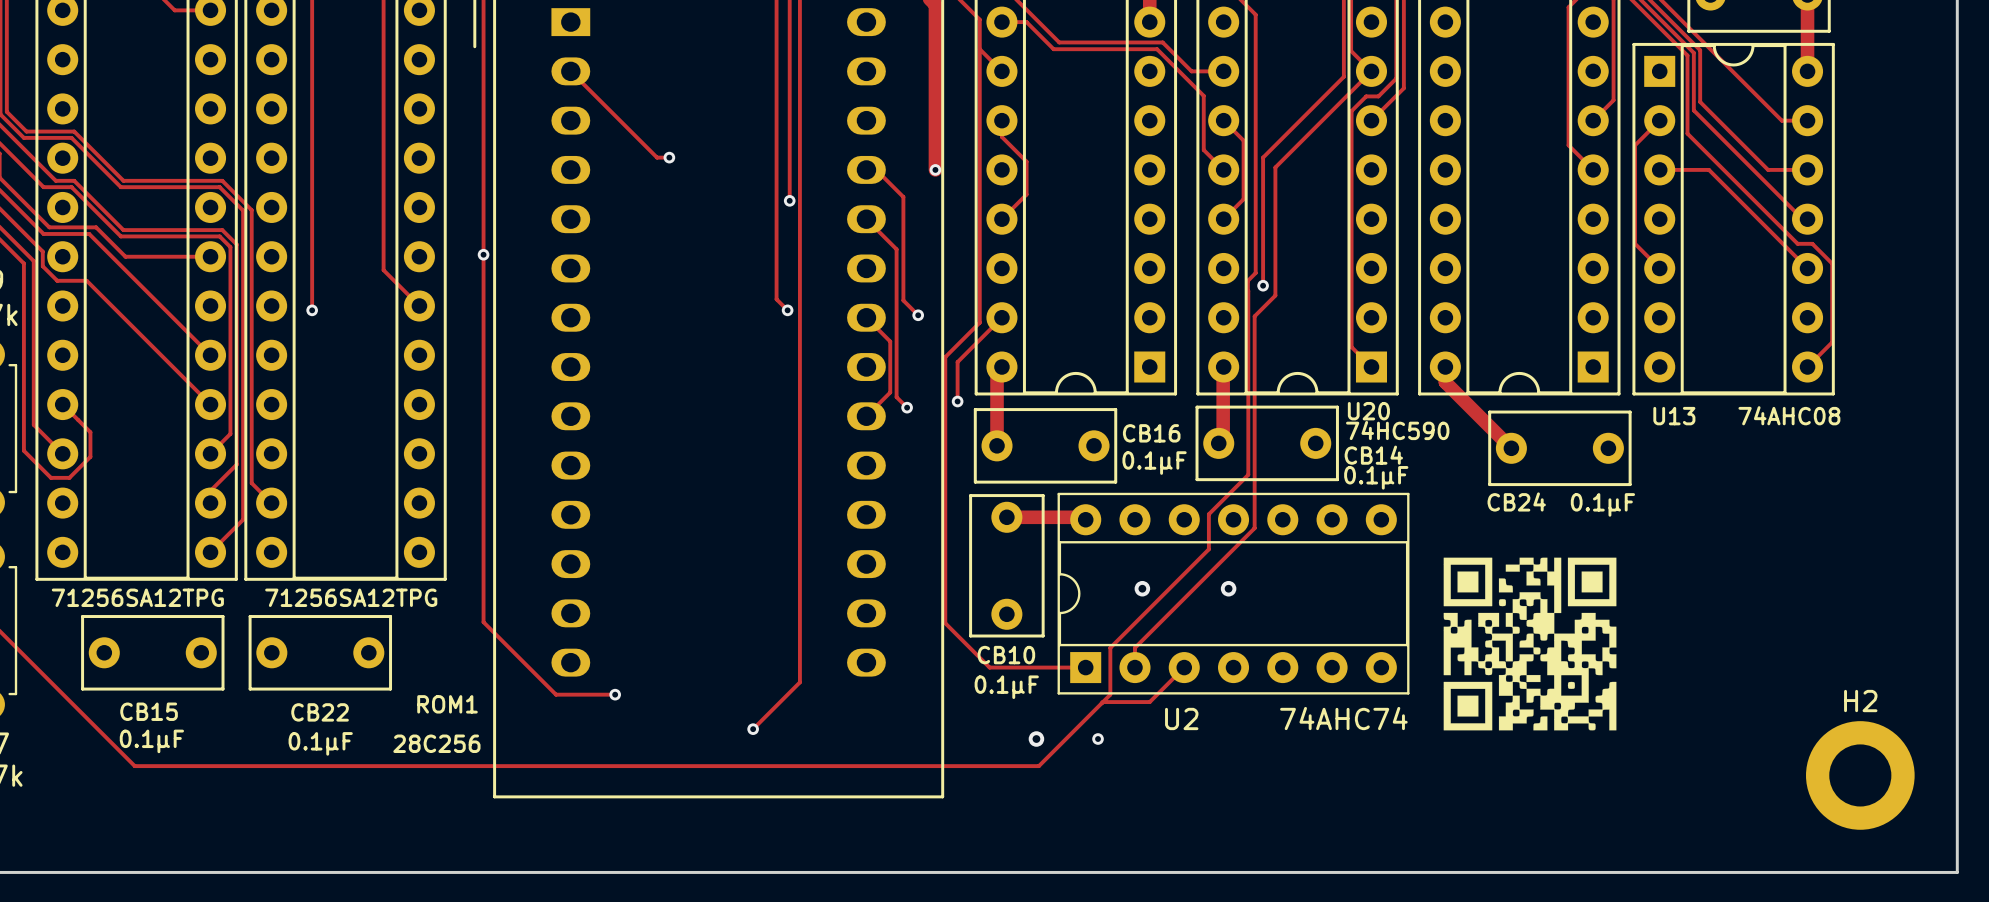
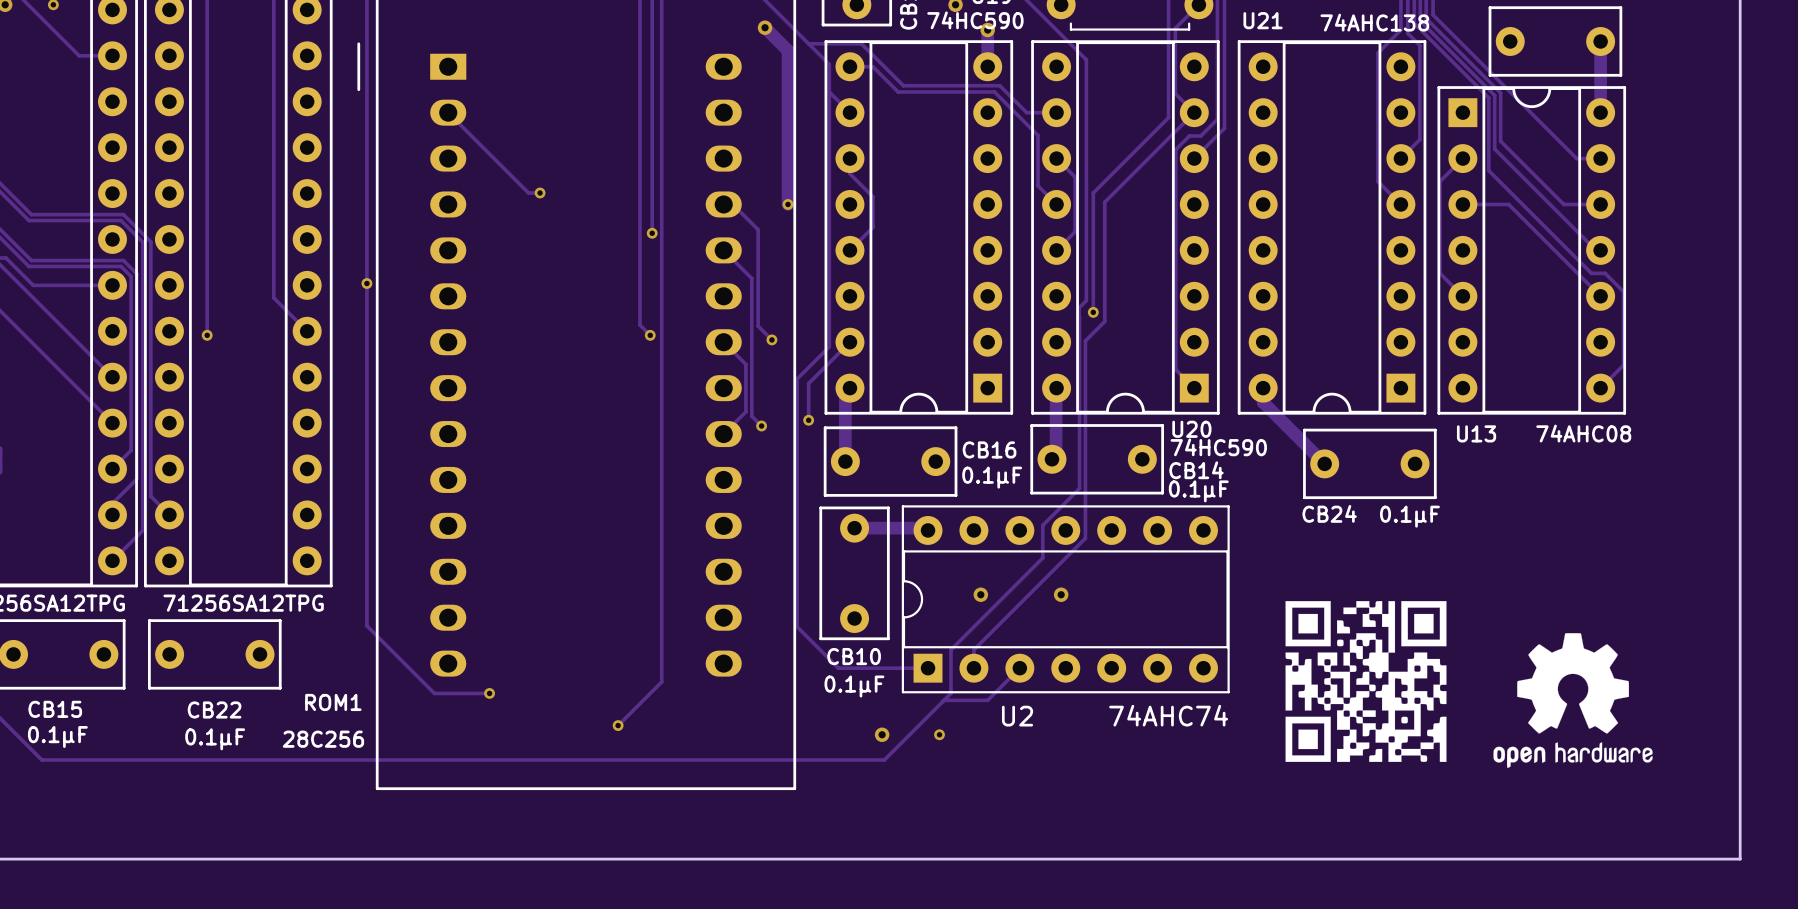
drawing: none -> [1493, 633, 1653, 768]
drawing position: (1530, 644) -> (1366, 681)
H2: (1860, 775) -> none

